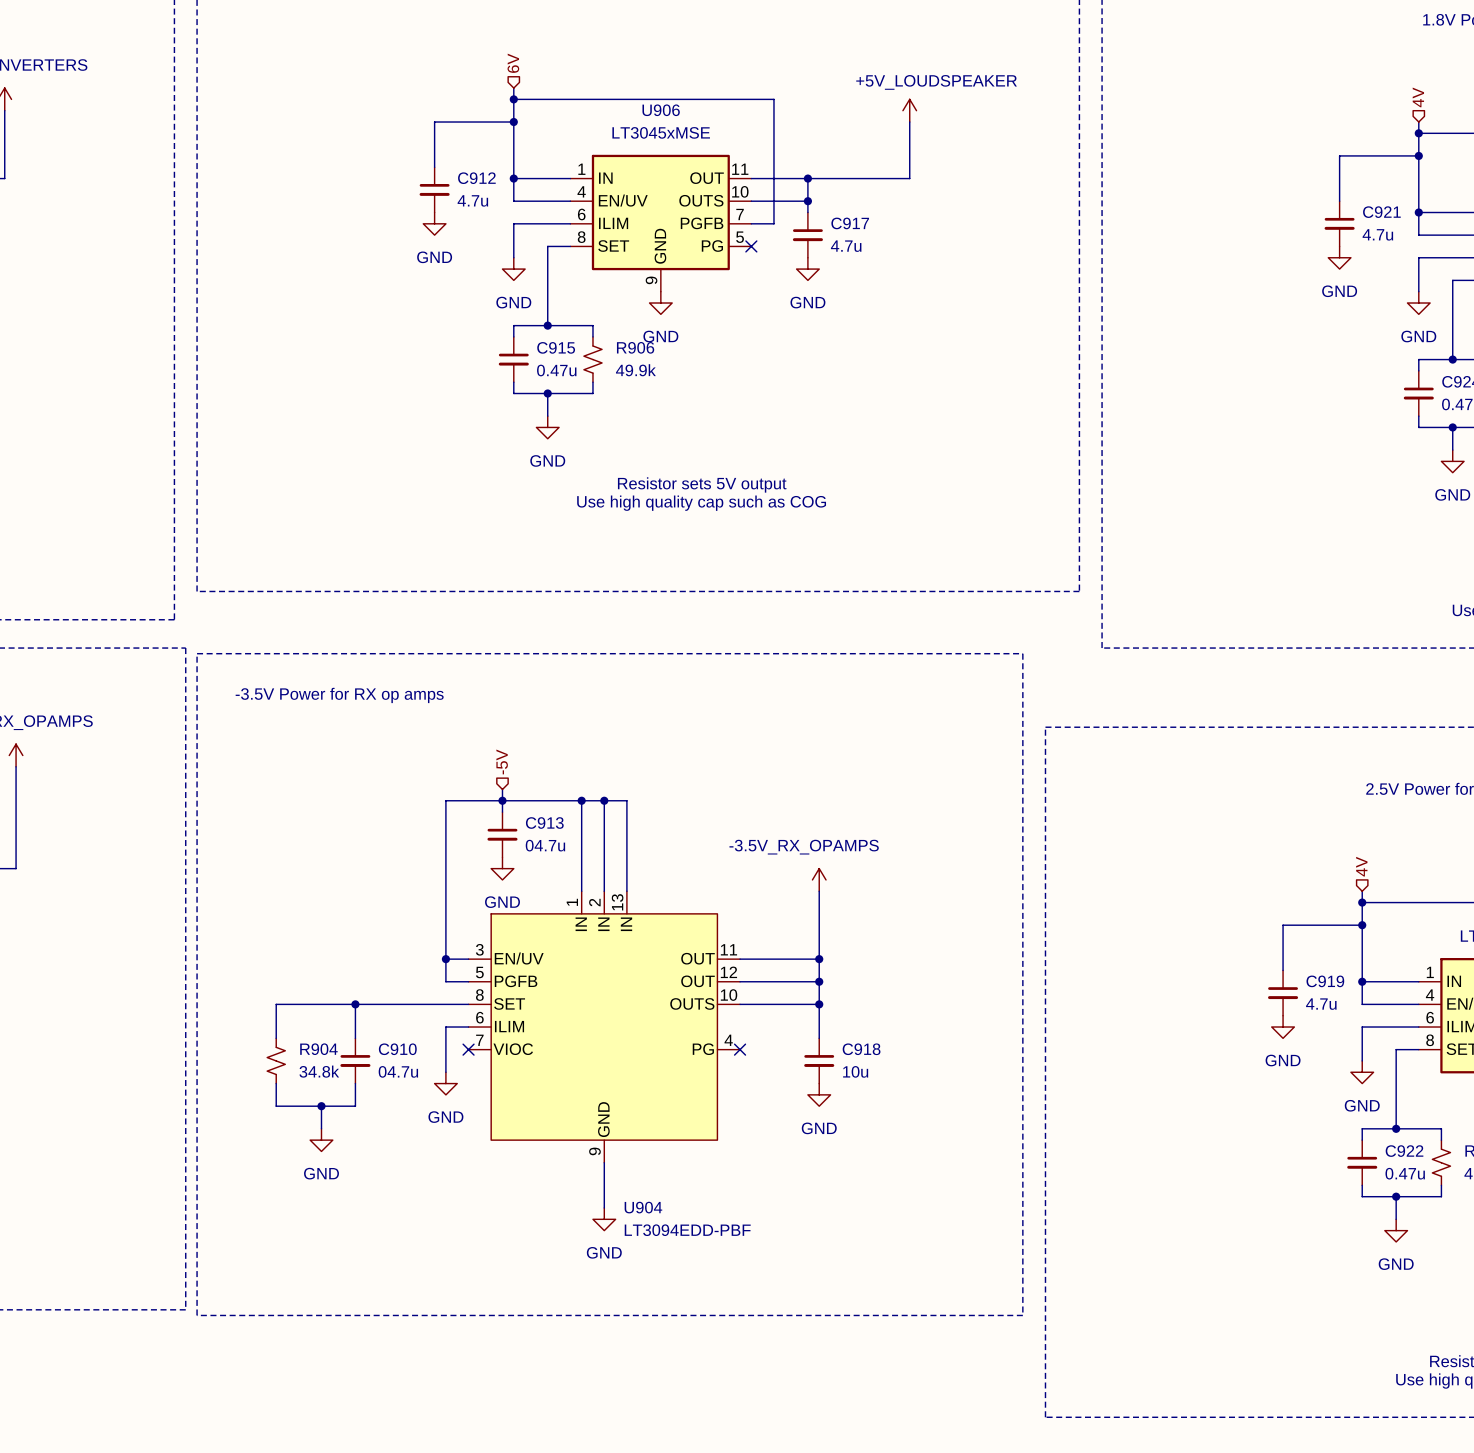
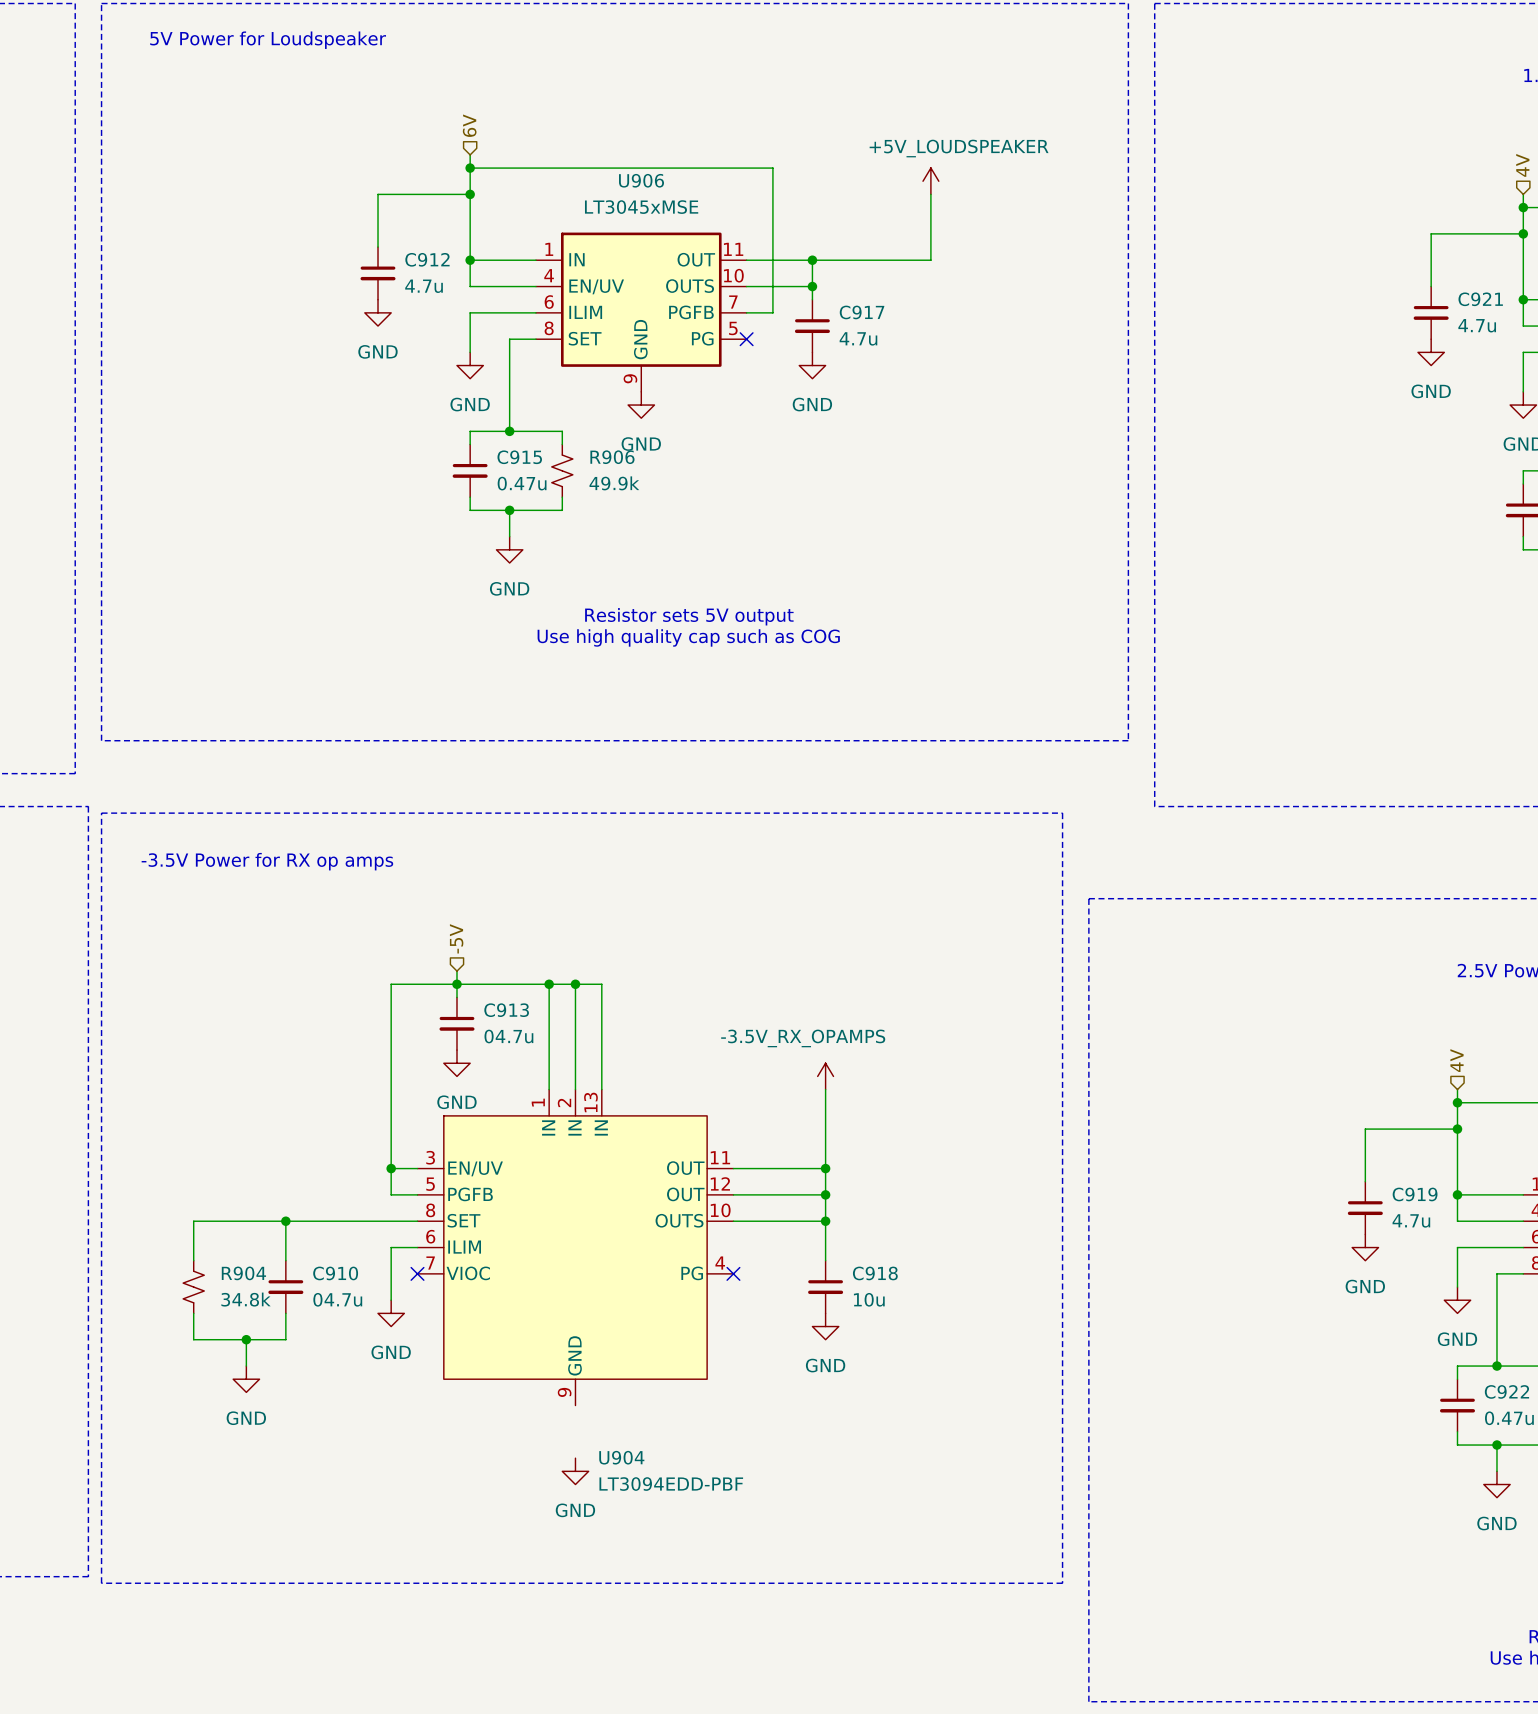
wire: (604, 1162) (604, 1208) -> none

